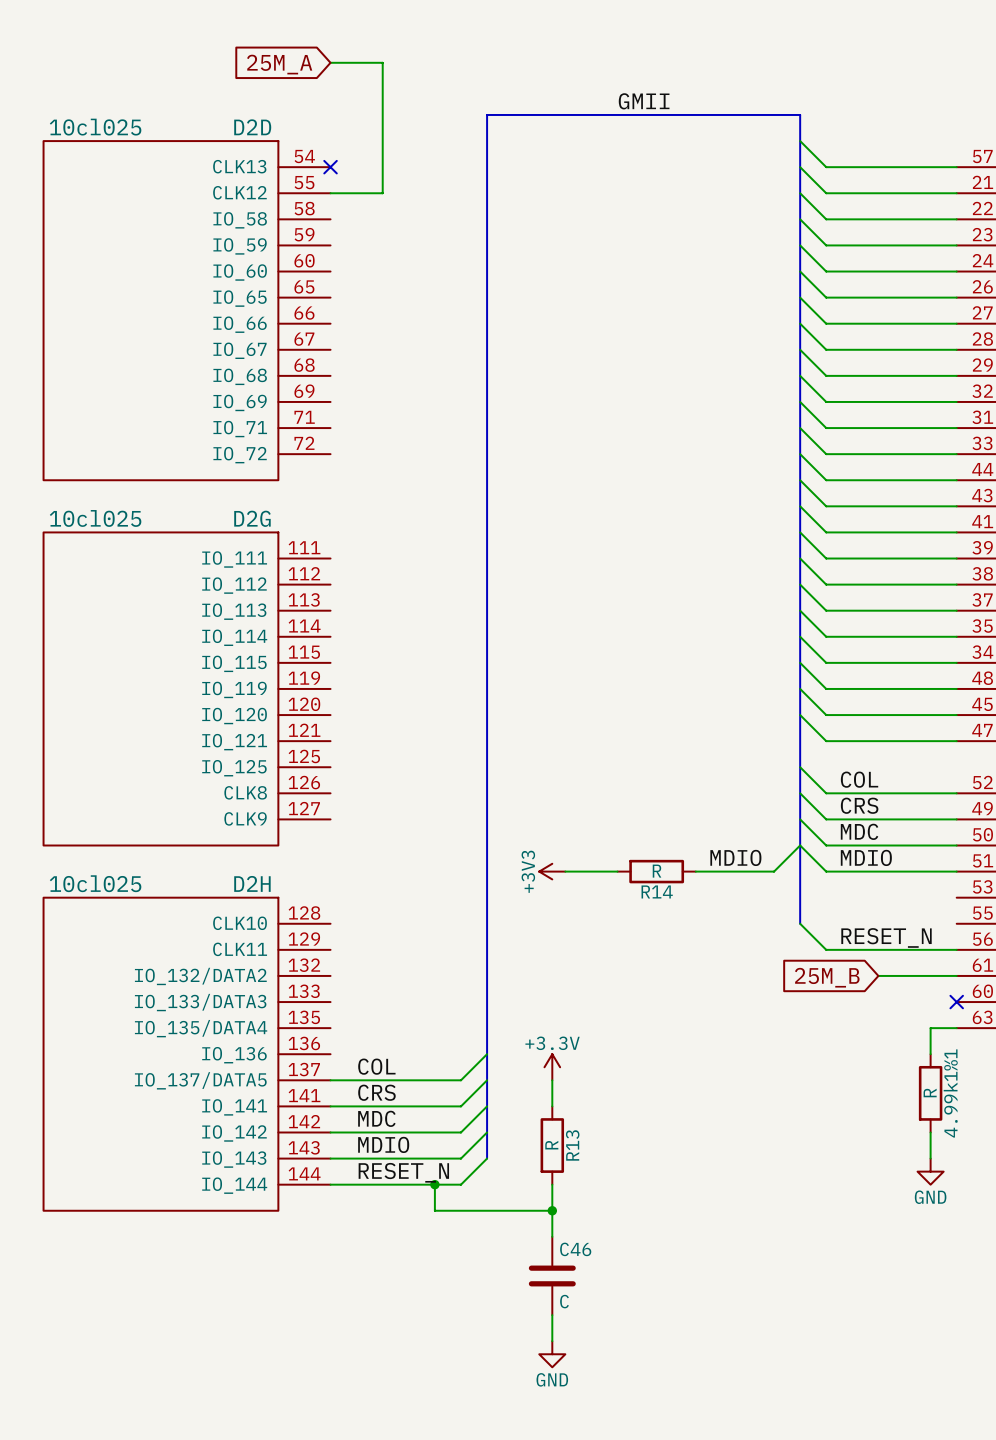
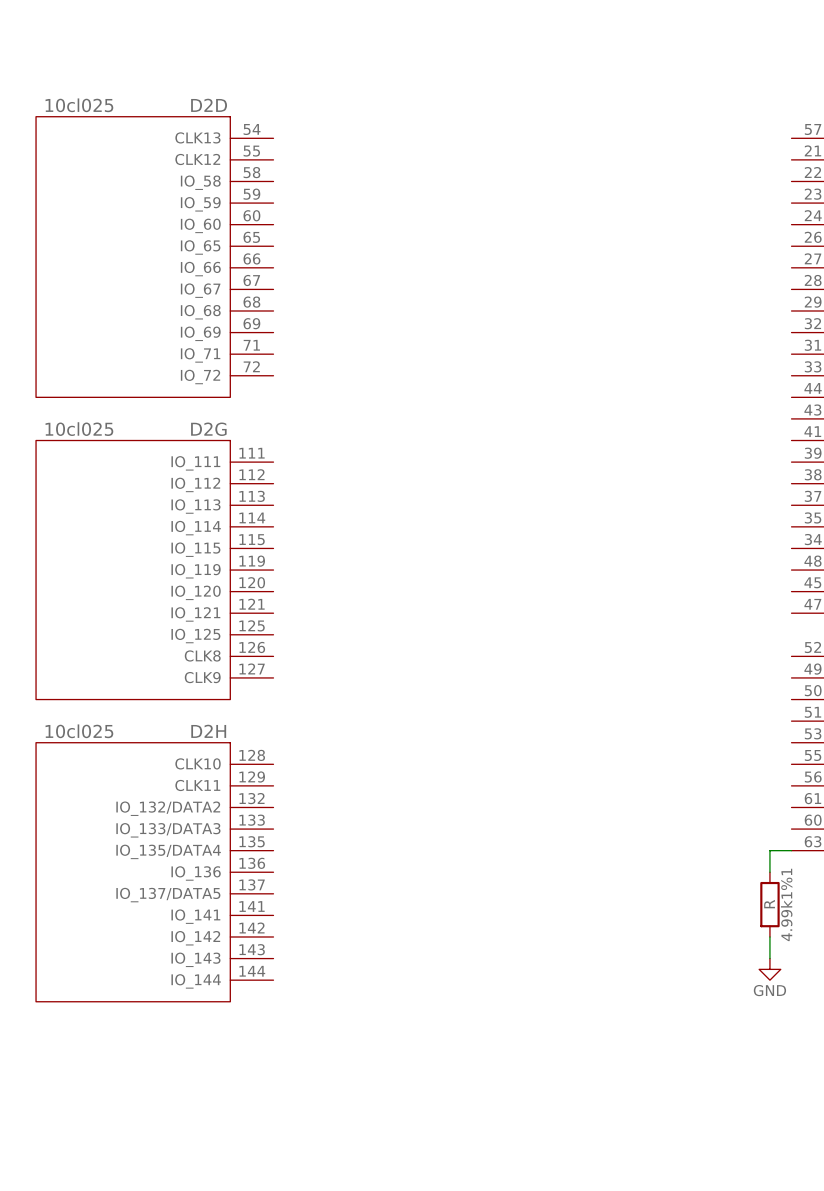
wire: (330, 62) (382, 62) (382, 193) (330, 193) -> none
global label: 25M_A (279, 64) -> none
label: GMII (644, 101) -> none
wire: (800, 141) (826, 167) (956, 167) -> none
no-connect mark: (330, 167) -> none
wire: (800, 167) (826, 193) (956, 193) -> none
wire: (800, 193) (826, 219) (956, 219) -> none
wire: (800, 219) (826, 245) (956, 245) -> none
wire: (800, 245) (826, 271) (956, 271) -> none
wire: (800, 271) (826, 297) (956, 297) -> none
wire: (800, 297) (826, 323) (956, 323) -> none
wire: (800, 323) (826, 349) (956, 349) -> none
wire: (800, 349) (826, 375) (956, 375) -> none
wire: (800, 375) (826, 401) (956, 401) -> none
wire: (800, 401) (826, 428) (956, 428) -> none
wire: (800, 428) (826, 454) (956, 454) -> none
wire: (800, 454) (826, 480) (956, 480) -> none
wire: (800, 480) (826, 506) (956, 506) -> none
wire: (800, 506) (826, 532) (956, 532) -> none
wire: (800, 532) (826, 558) (956, 558) -> none
wire: (800, 558) (826, 584) (956, 584) -> none
wire: (800, 584) (826, 610) (956, 610) -> none
wire: (800, 610) (826, 636) (956, 636) -> none
wire: (800, 636) (826, 662) (956, 662) -> none
wire: (800, 662) (826, 688) (956, 688) -> none
wire: (800, 688) (826, 715) (956, 715) -> none
wire: (800, 715) (826, 741) (956, 741) -> none
wire: (800, 767) (826, 793) (956, 793) -> none
label: COL (859, 779) -> none
wire: (800, 793) (826, 819) (956, 819) -> none
label: CRS (859, 805) -> none
wire: (800, 819) (826, 845) (956, 845) -> none
label: MDC (859, 831) -> none
label: MDIO (735, 857) -> none
label: MDIO (866, 857) -> none
power symbol: +3V3 (552, 871) -> none
wire: (565, 871) (617, 871) -> none
R14: R (656, 871) -> none
wire: (695, 871) (774, 871) (800, 845) (826, 871) (956, 871) -> none
wire: (800, 923) (826, 949) (956, 949) -> none
bus: (800, 923) (800, 114) (487, 114) (487, 1158) -> none
label: RESET_N (886, 937) -> none
wire: (878, 975) (956, 975) -> none
global label: 25M_B (827, 977) -> none
no-connect mark: (956, 1002) -> none
wire: (487, 1054) (460, 1080) (330, 1080) -> none
label: COL (376, 1066) -> none
power symbol: +3.3V (552, 1067) -> none
wire: (487, 1080) (460, 1106) (330, 1106) -> none
wire: (552, 1080) (552, 1106) -> none
label: CRS (376, 1092) -> none
wire: (487, 1106) (460, 1132) (330, 1132) -> none
label: MDC (376, 1118) -> none
wire: (487, 1132) (460, 1158) (330, 1158) -> none
label: MDIO (383, 1144) -> none
R13: R (552, 1145) -> none
wire: (487, 1158) (460, 1184) (330, 1184) -> none
label: RESET_N (403, 1172) -> none
wire: (434, 1184) (434, 1210) (552, 1210) -> none
junction: (434, 1184) -> none
wire: (552, 1184) (552, 1236) -> none
junction: (552, 1210) -> none
C46: C (552, 1275) -> none
wire: (552, 1315) (552, 1341) -> none
power symbol: GND (552, 1354) -> none

